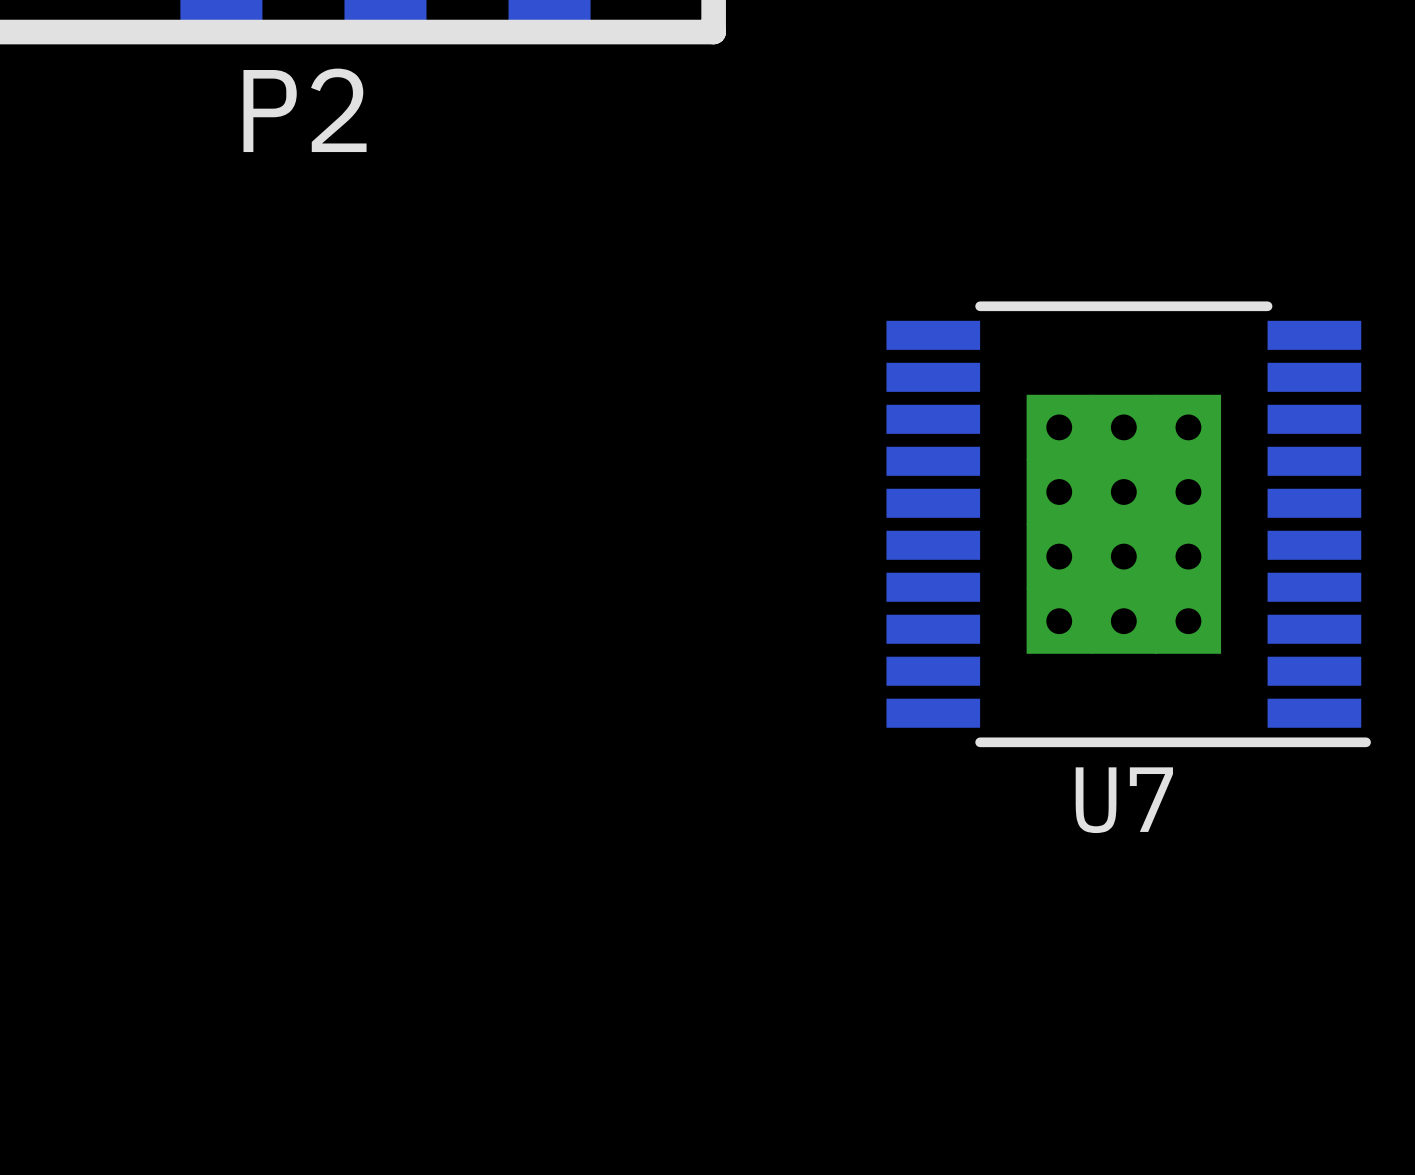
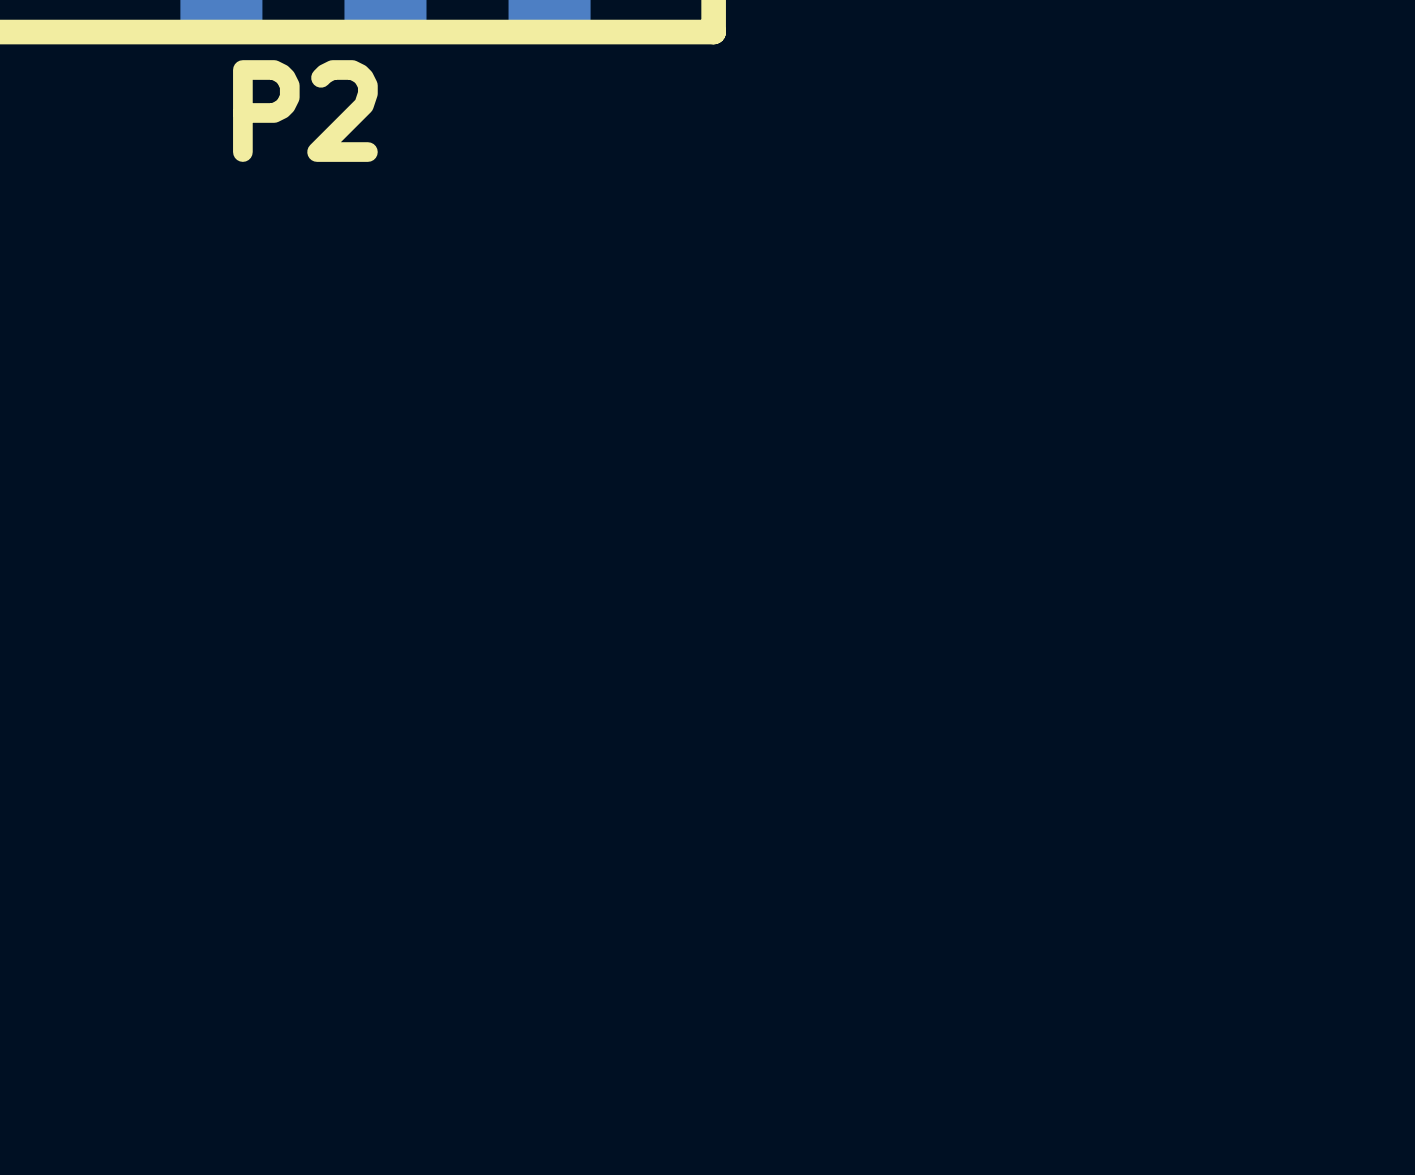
U7: (1128, 524) -> none

